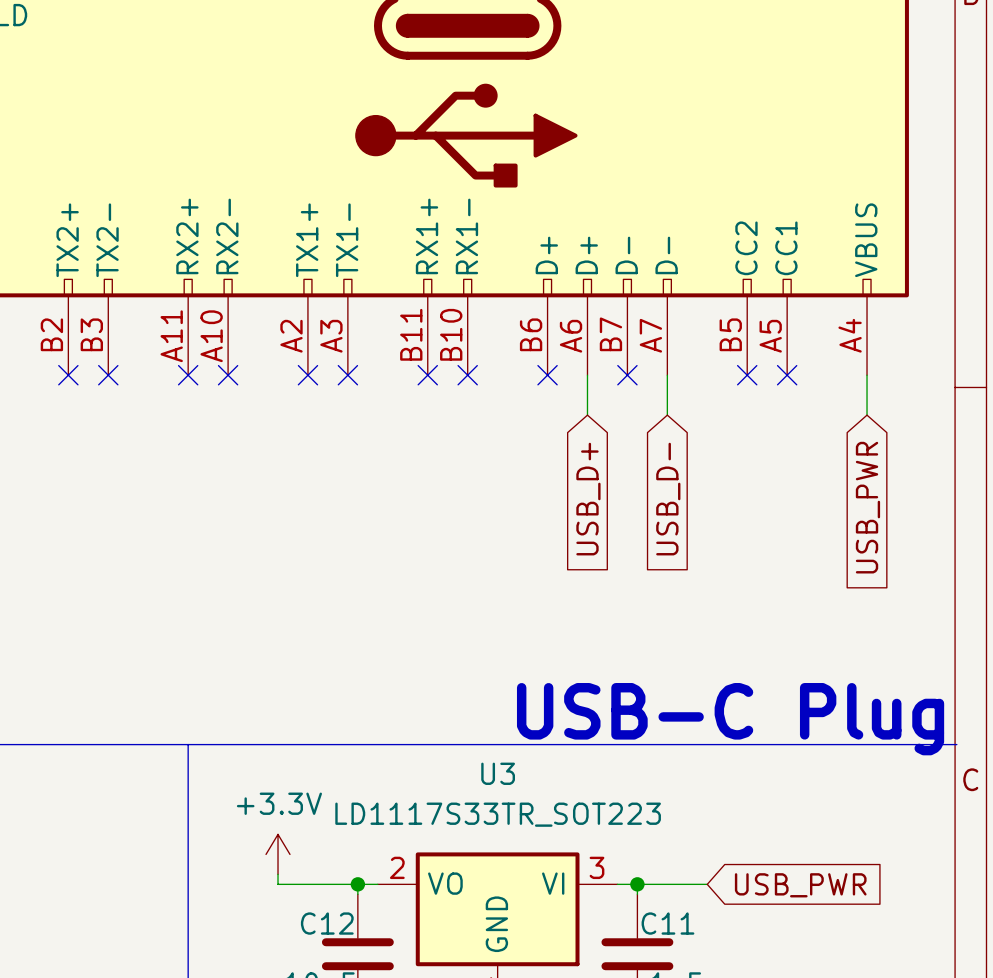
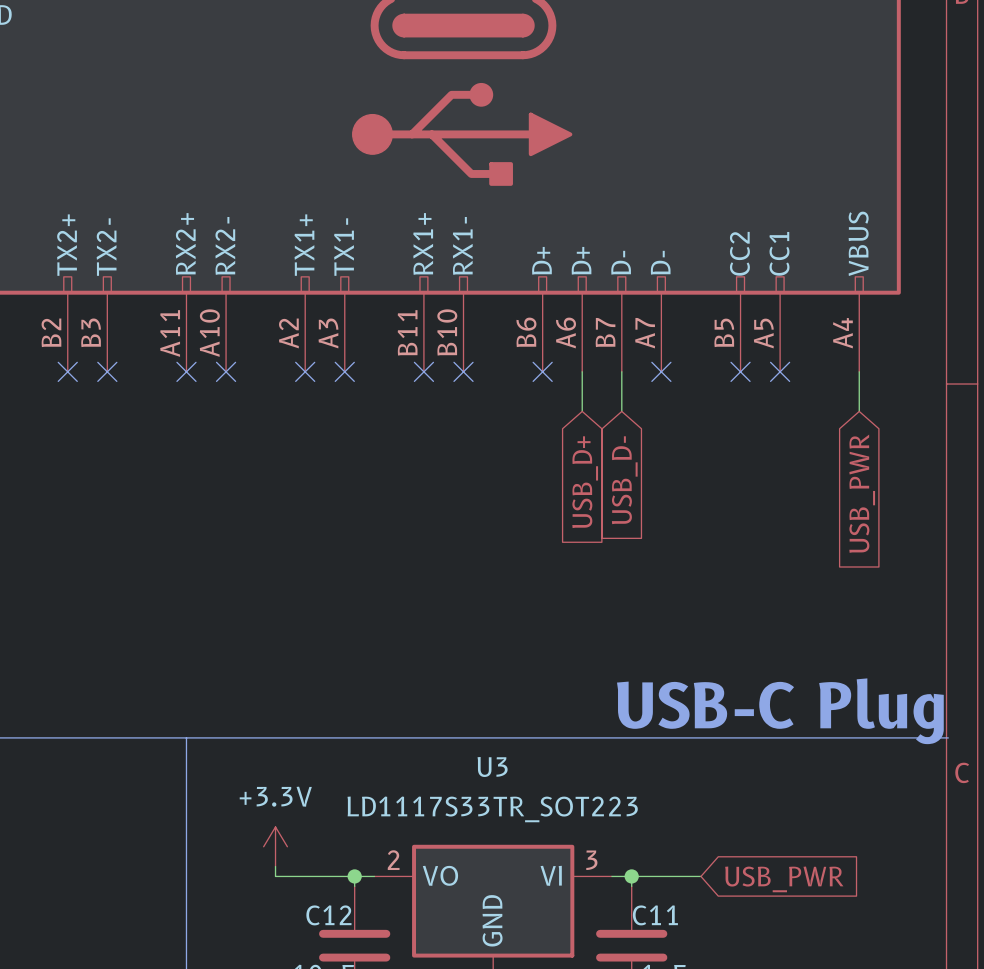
no-connect mark position: (627, 375) -> (661, 371)
wire: (667, 375) (667, 415) -> (621, 371) (621, 411)
global label position: USB_D- (668, 499) -> USB_D- (624, 480)

